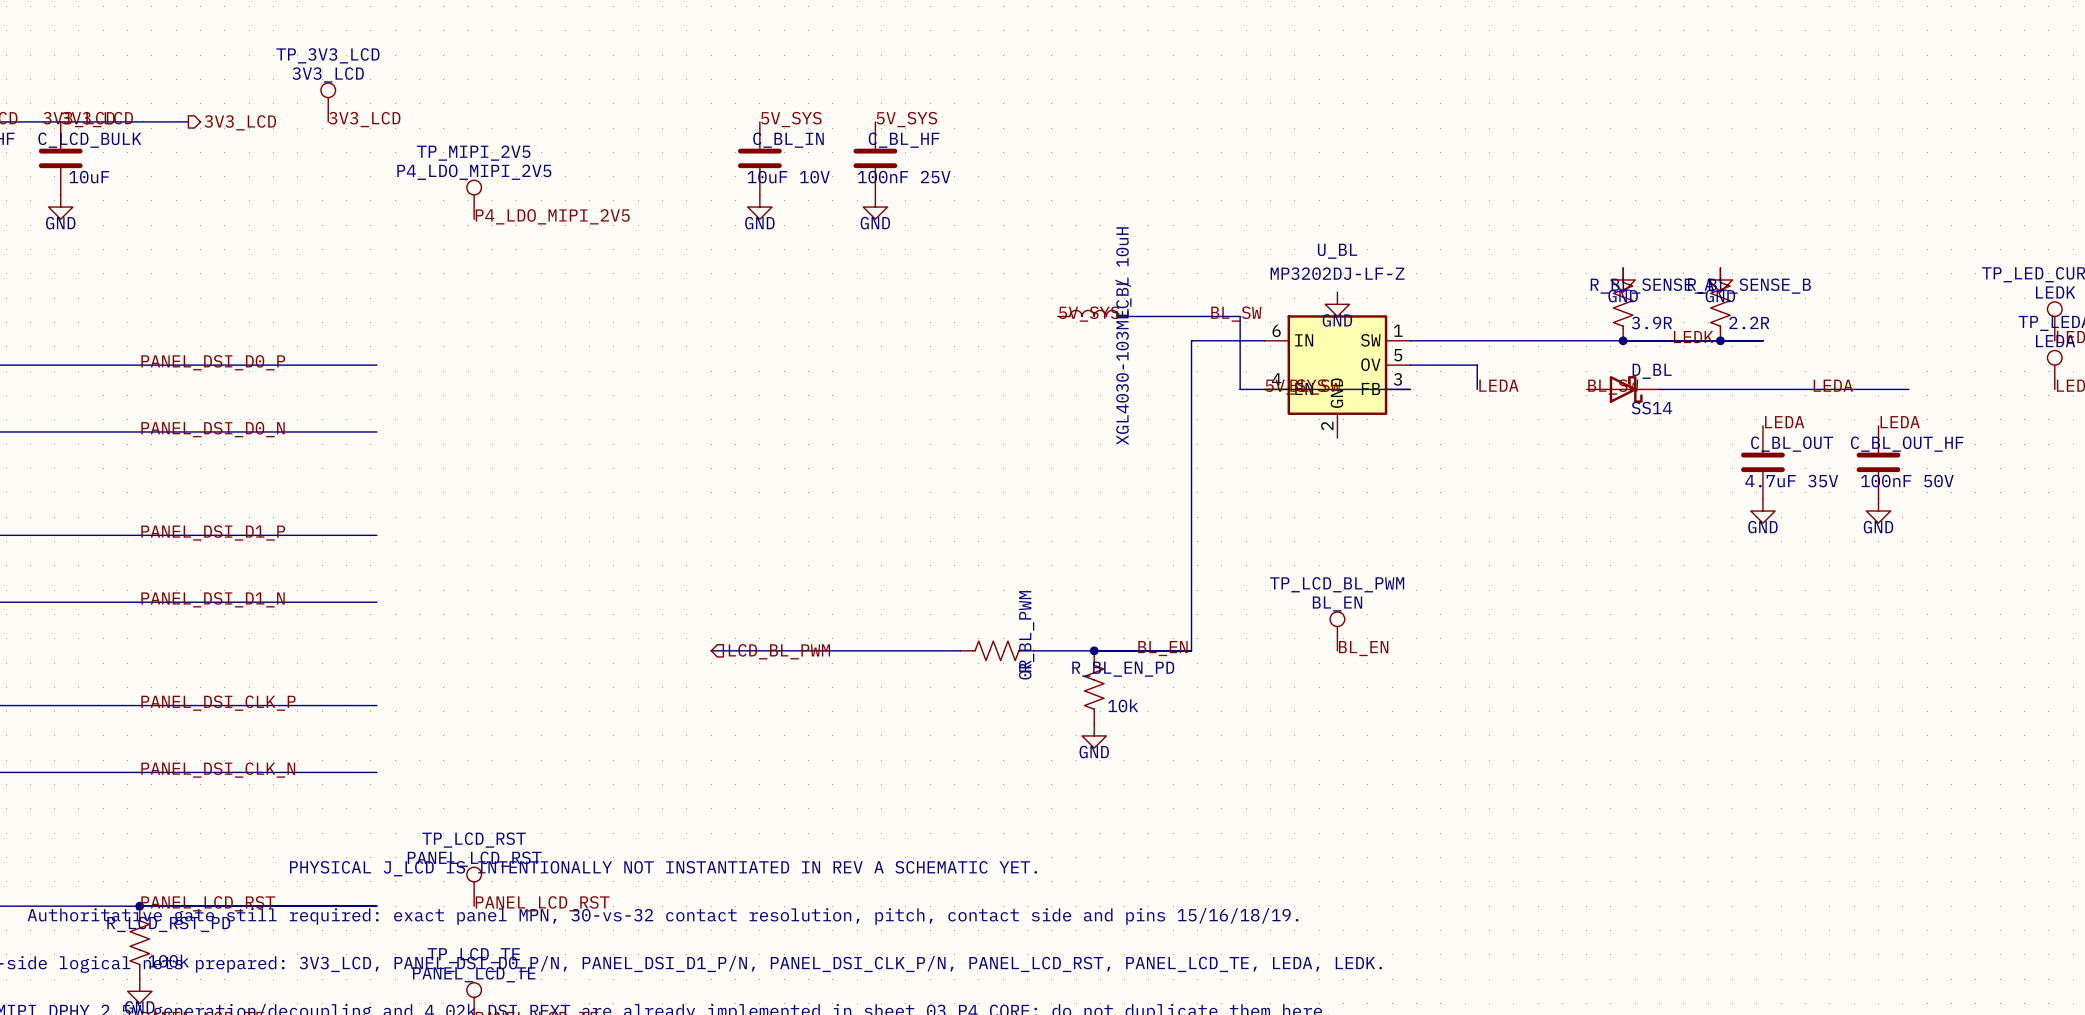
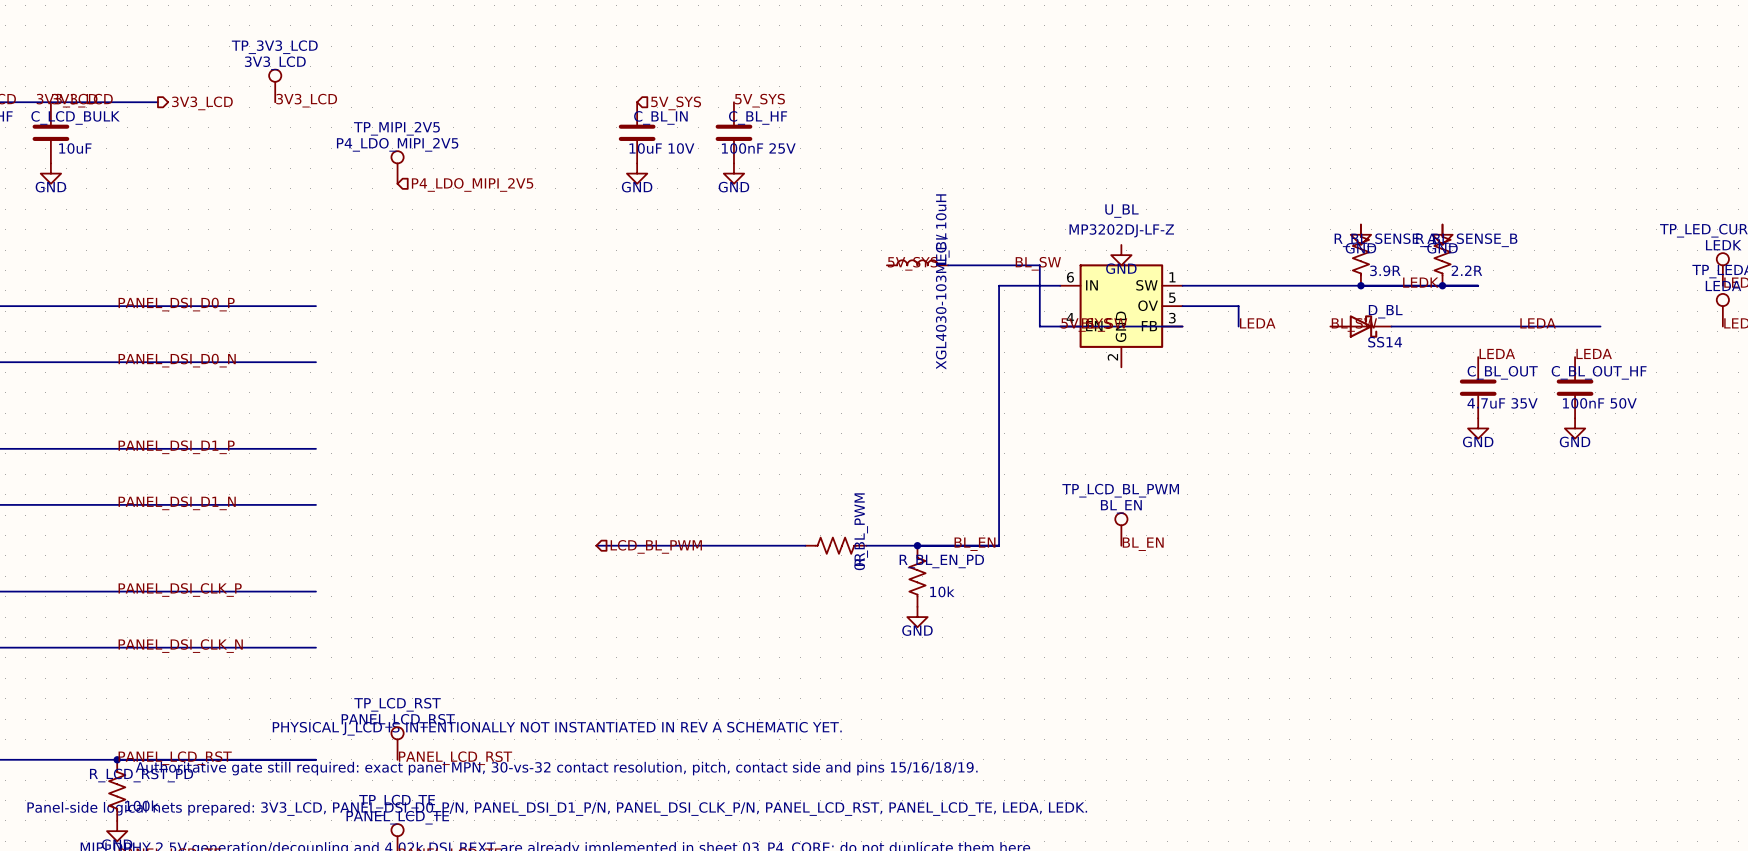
label: 5V_SYS (791, 119) -> none
hierarchical label: none -> 5V_SYS (676, 103)
label: P4_LDO_MIPI_2V5 (552, 216) -> none
hierarchical label: none -> P4_LDO_MIPI_2V5 (472, 184)

